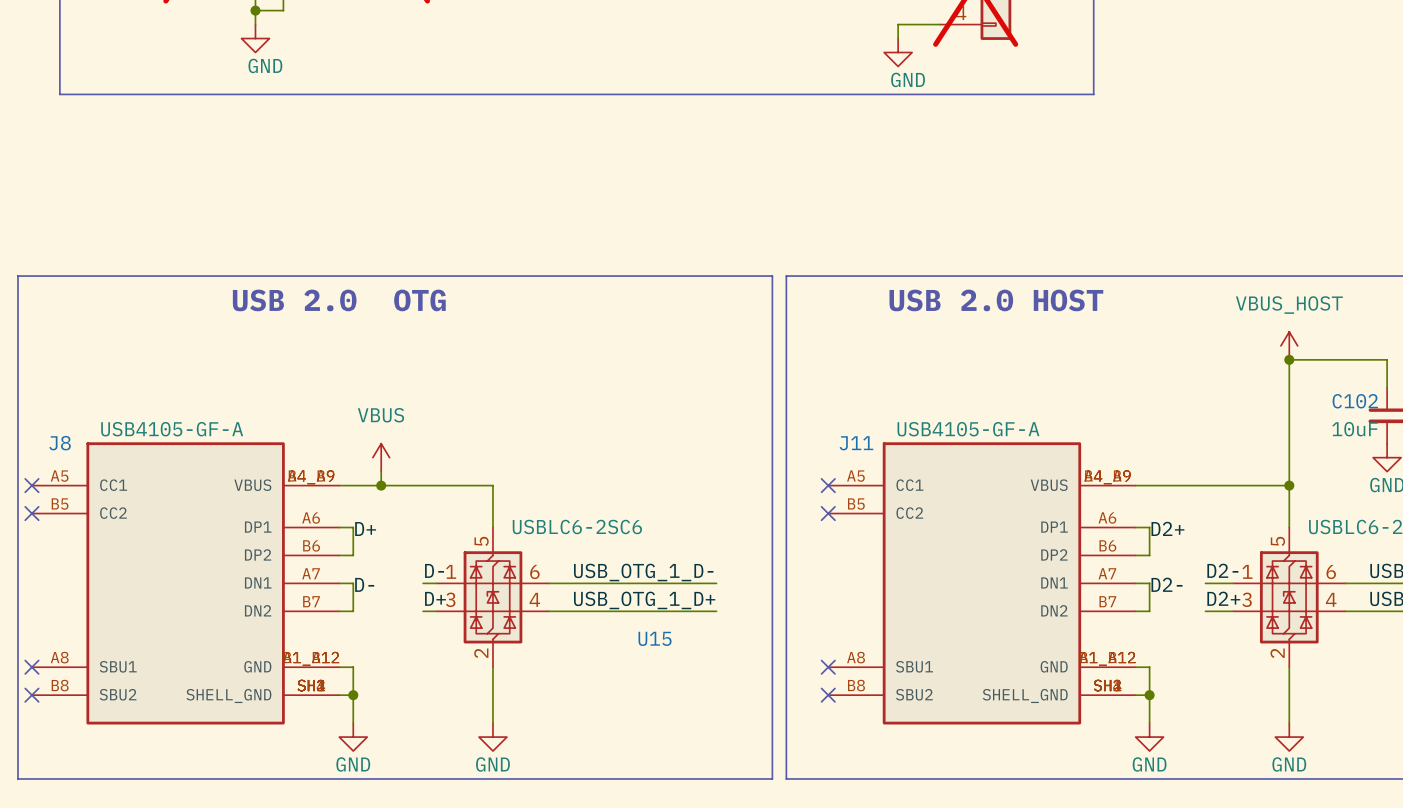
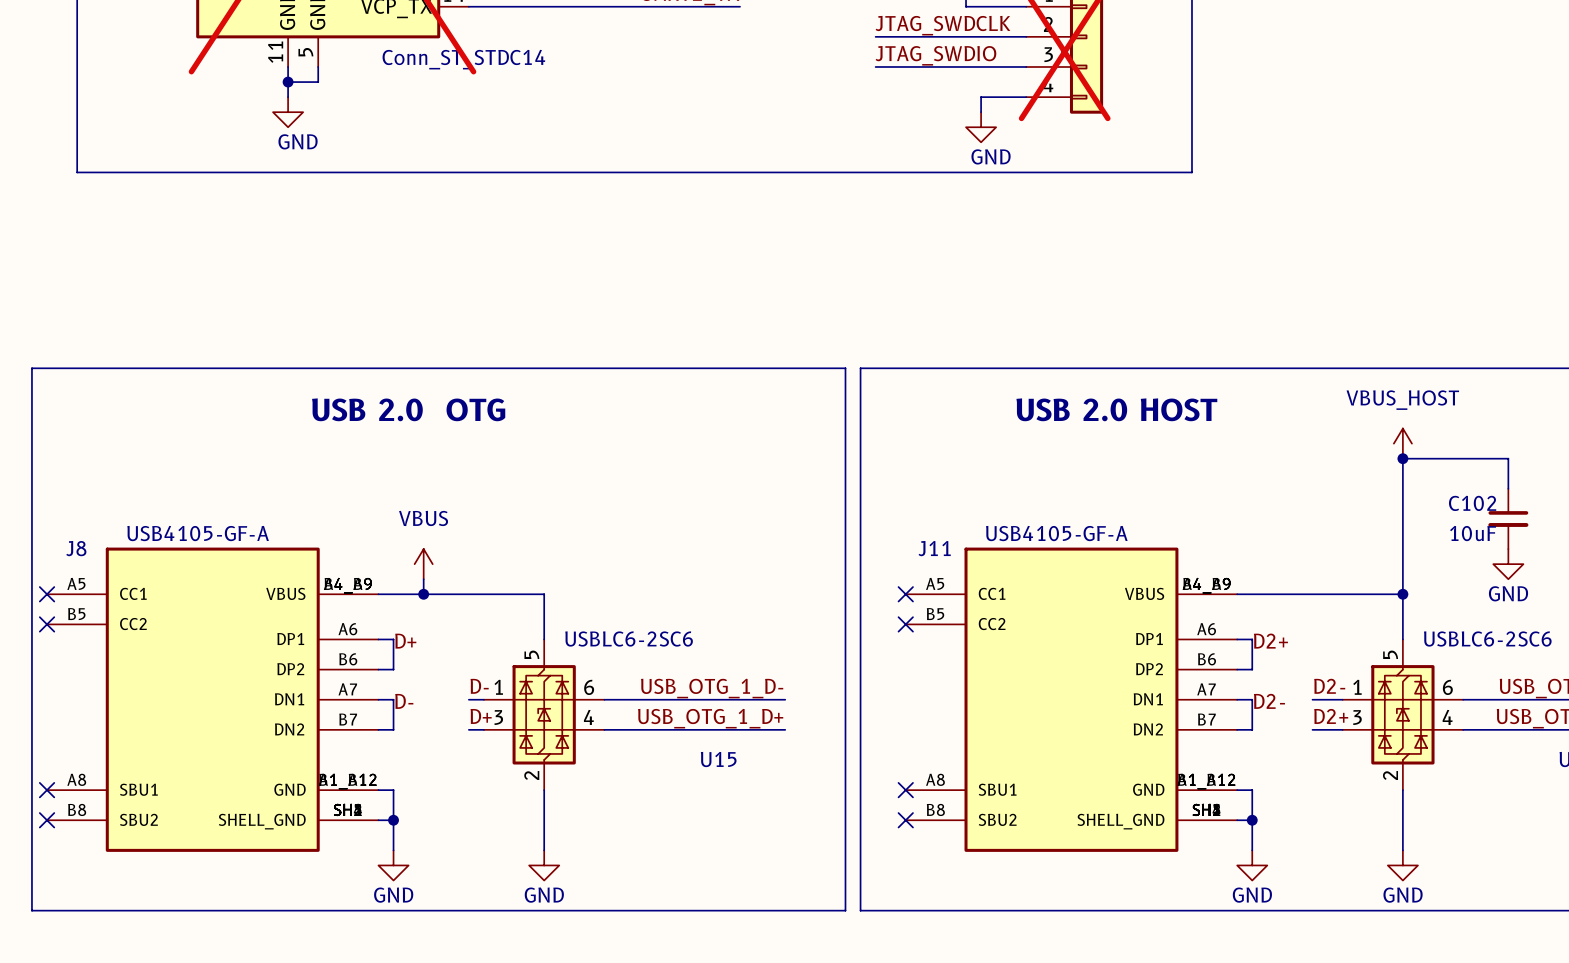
text position: USB 2.0 OTG (339, 300) -> USB 2.0 OTG (408, 409)
text position: USB 2.0 HOST (996, 300) -> USB 2.0 HOST (1116, 409)

